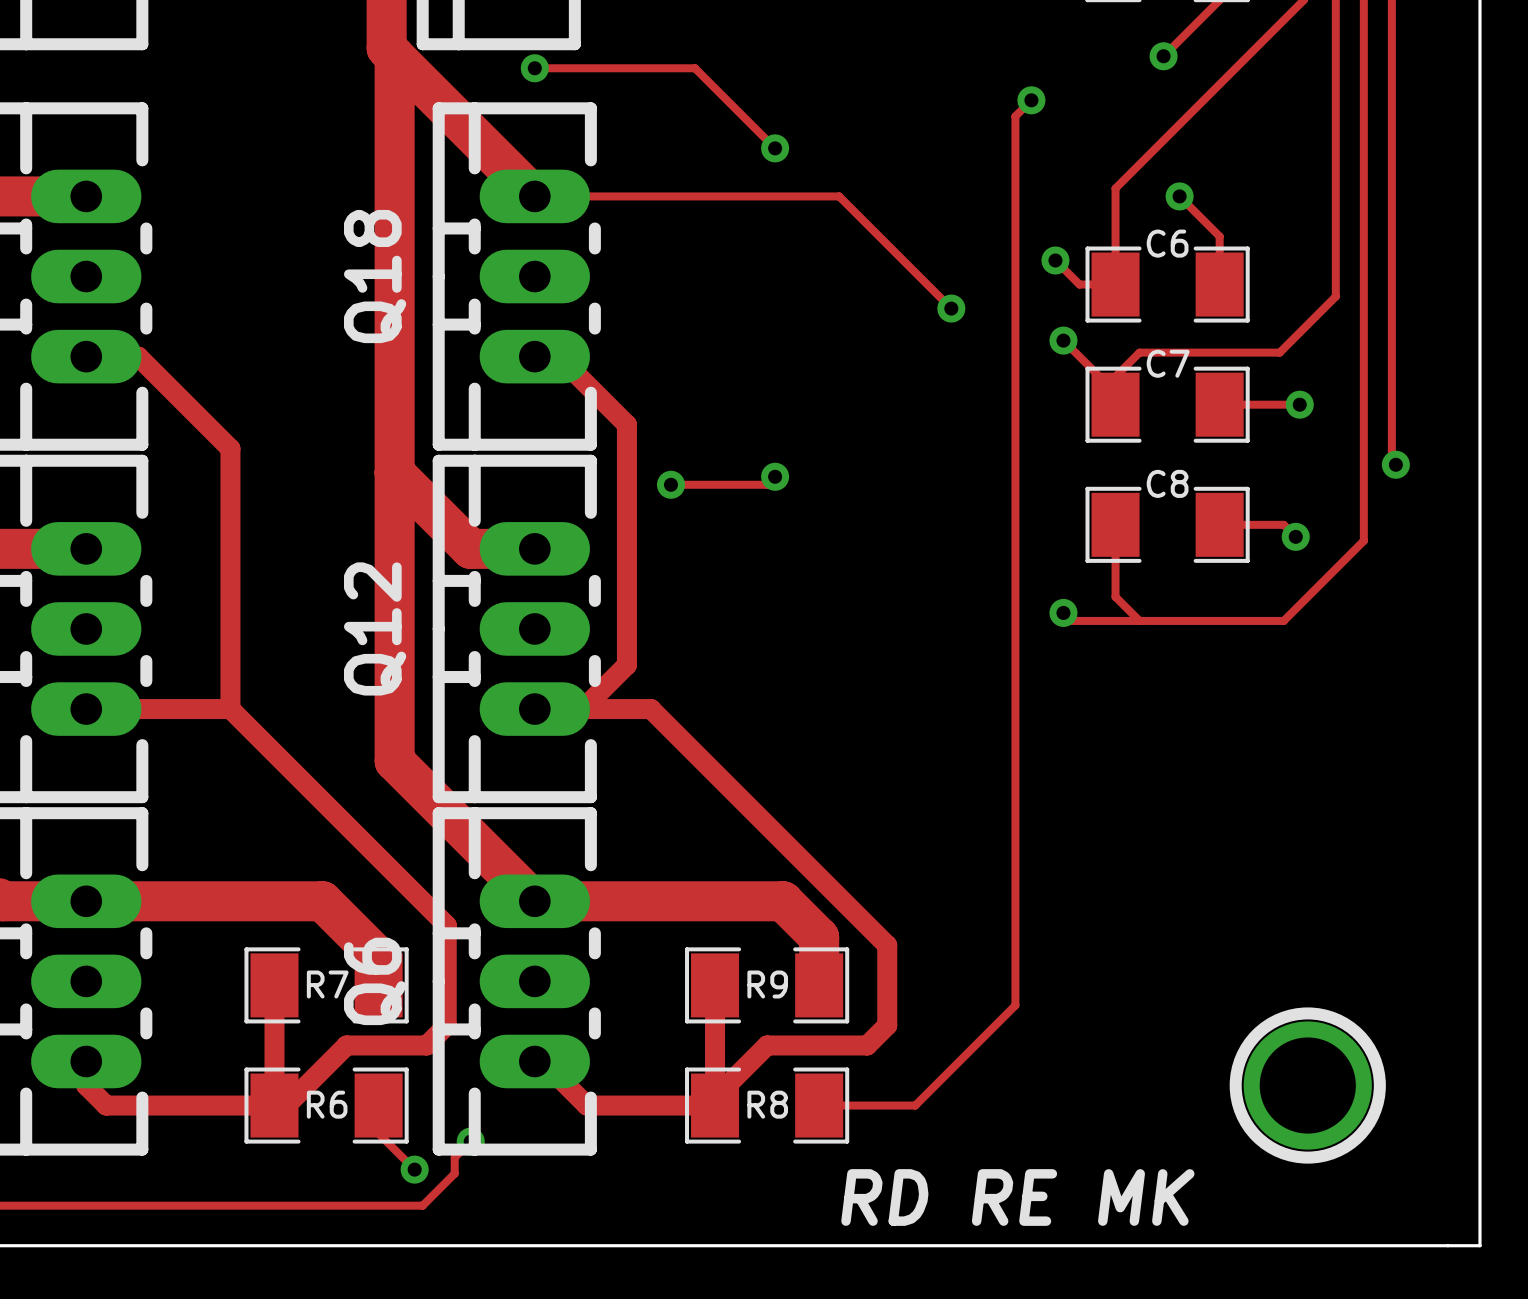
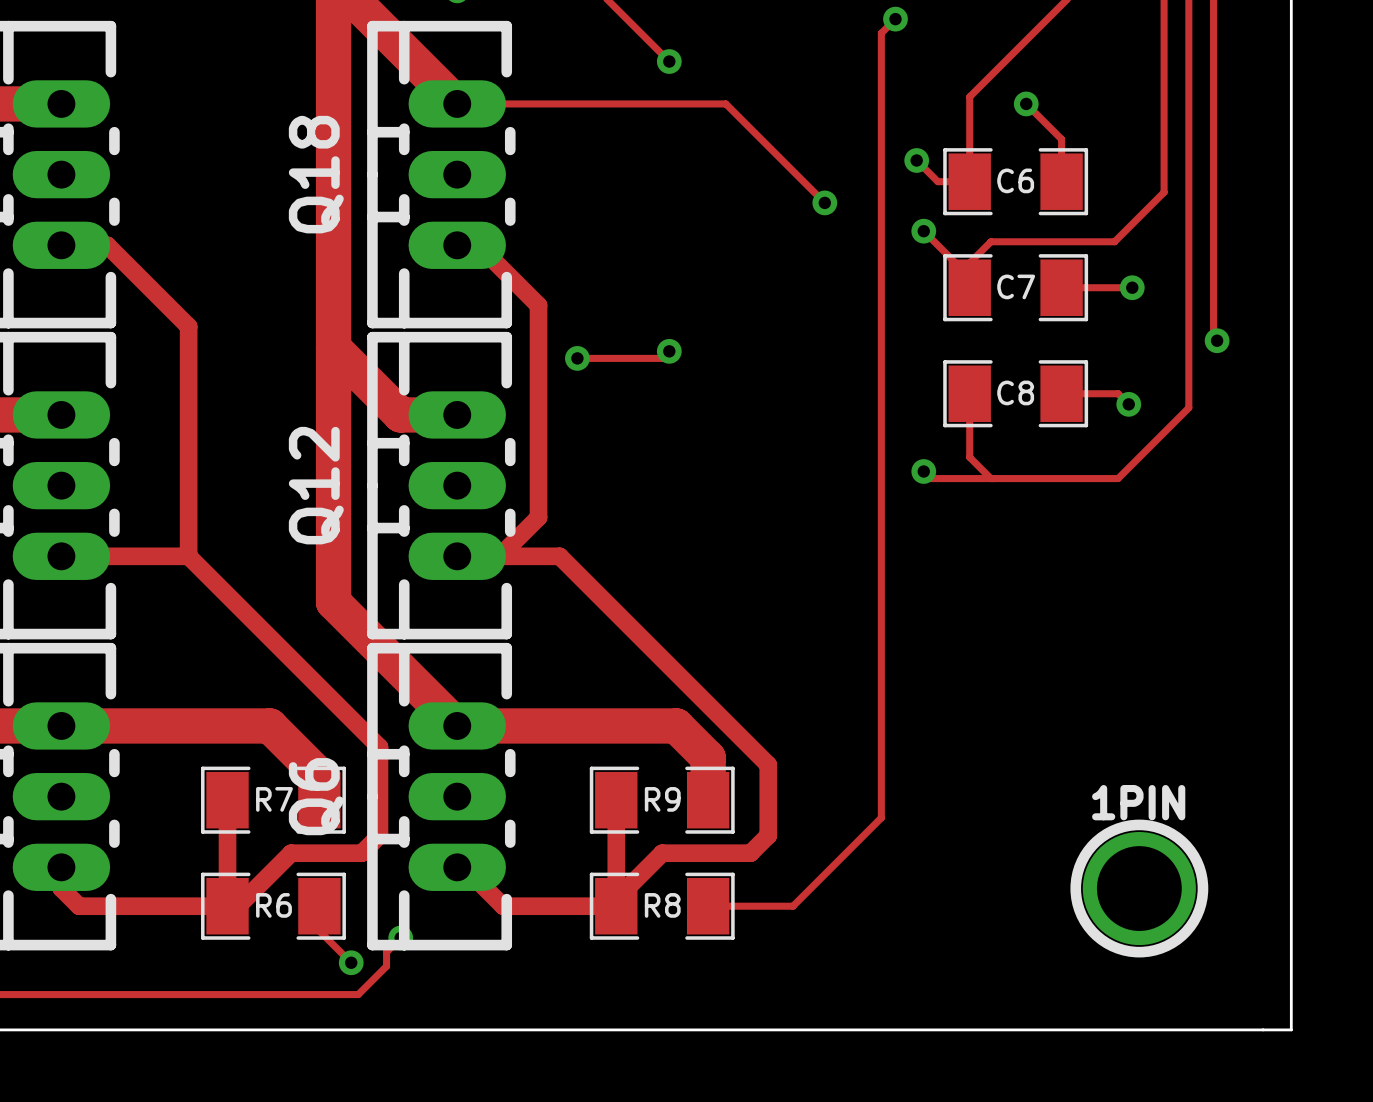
C6 name position: C6 (1167, 243) -> C6 (1015, 180)
C7 name position: C7 (1168, 363) -> C7 (1016, 286)
C8 name position: C8 (1167, 483) -> C8 (1015, 392)
1PIN name: none -> 1PIN (1138, 802)
text: RD RE MK (1017, 1197) -> none

